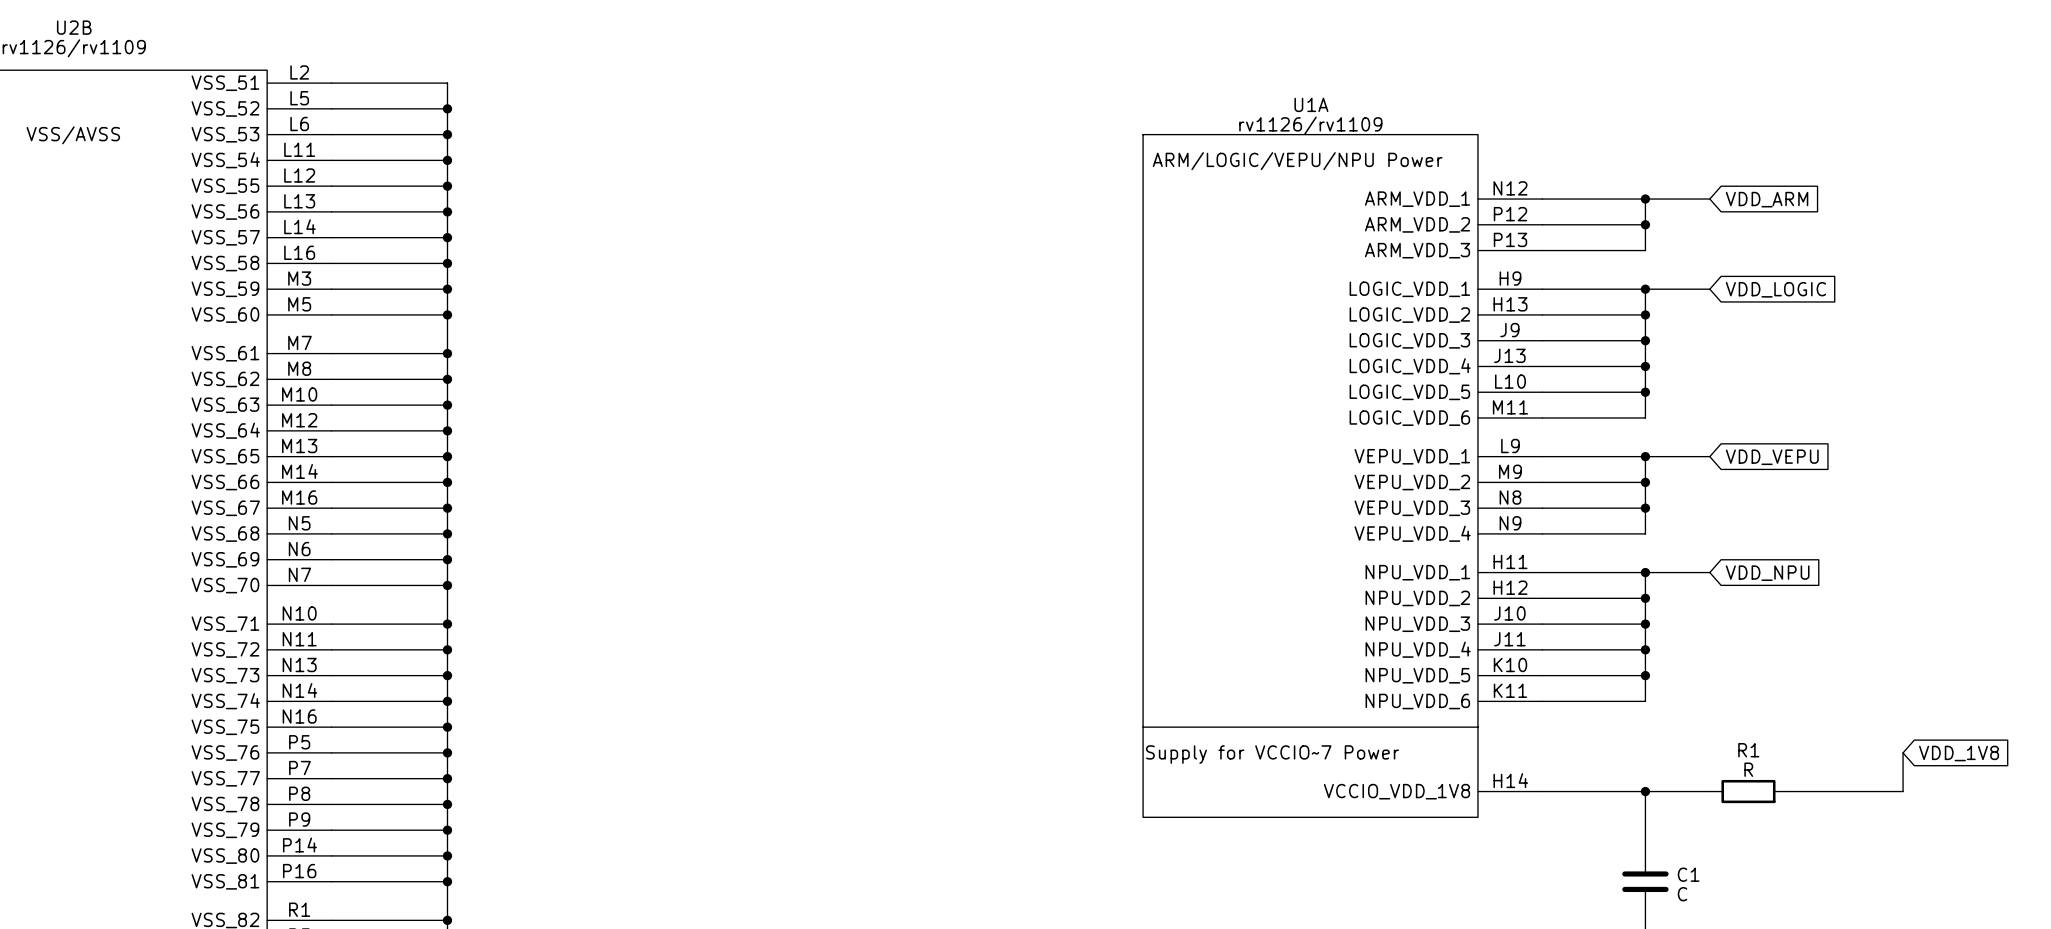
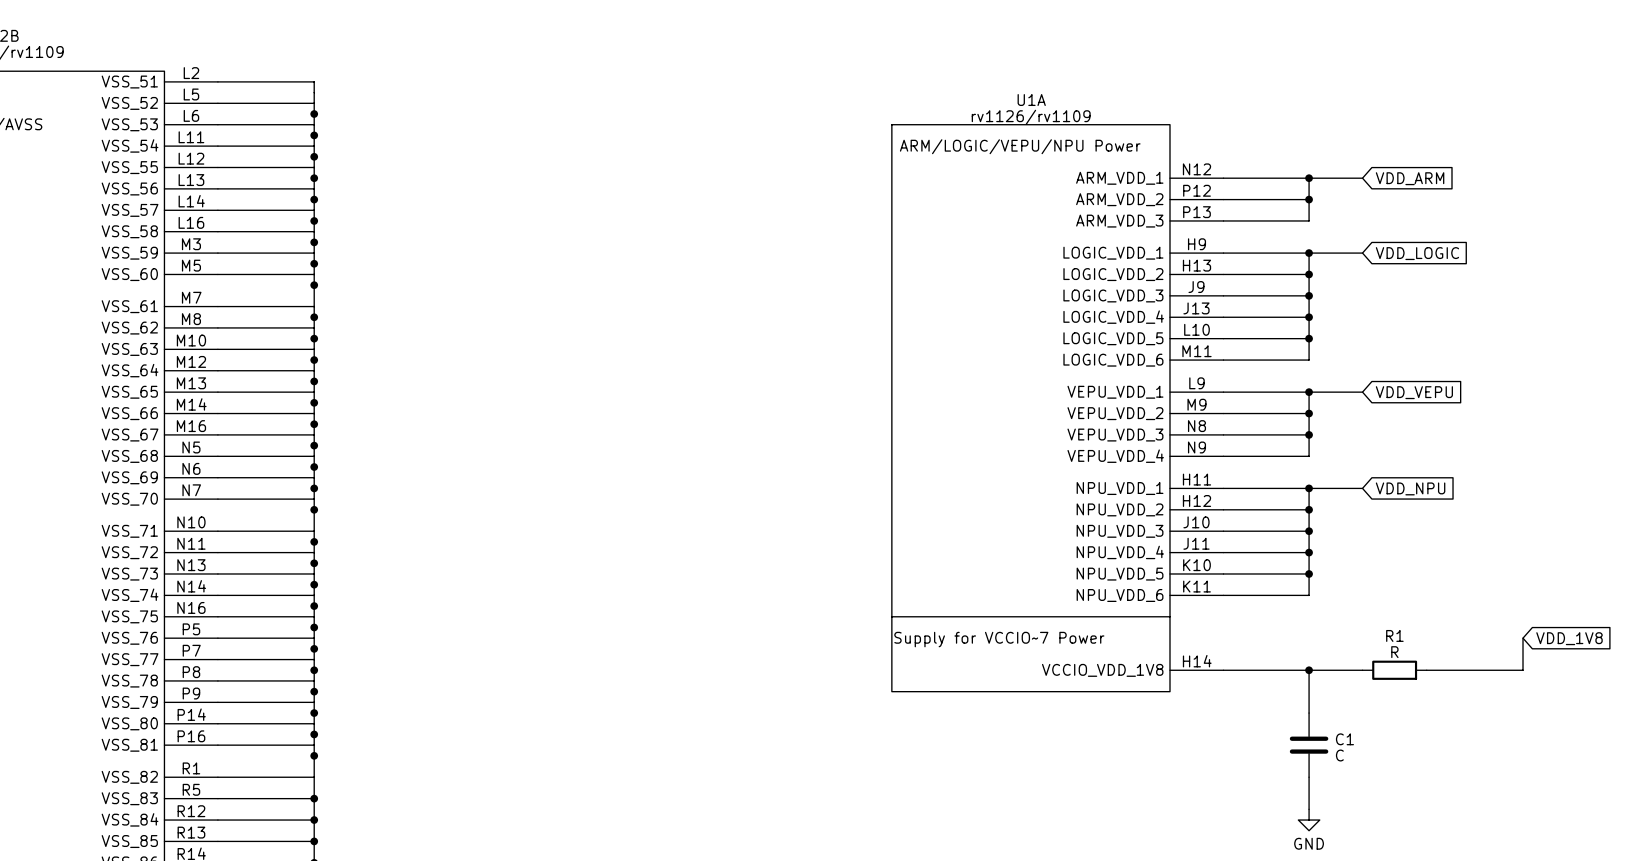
junction: (447, 108) -> none
junction: none -> (314, 114)
junction: (447, 134) -> none
junction: none -> (314, 135)
junction: (447, 160) -> none
junction: none -> (314, 156)
junction: (447, 186) -> none
junction: none -> (314, 178)
junction: (447, 211) -> none
junction: none -> (314, 199)
junction: (447, 237) -> none
junction: none -> (314, 220)
junction: (447, 263) -> none
junction: none -> (314, 242)
junction: (447, 289) -> none
junction: none -> (314, 263)
junction: (447, 314) -> none
junction: none -> (314, 285)
junction: (447, 353) -> none
junction: none -> (314, 317)
junction: (447, 379) -> none
junction: none -> (314, 338)
junction: (447, 405) -> none
junction: none -> (314, 360)
junction: (447, 430) -> none
junction: none -> (314, 381)
junction: (447, 456) -> none
junction: none -> (314, 402)
junction: (447, 482) -> none
junction: none -> (314, 424)
junction: (447, 508) -> none
junction: none -> (314, 445)
junction: (447, 533) -> none
junction: none -> (314, 467)
junction: (447, 559) -> none
junction: none -> (314, 488)
junction: (447, 585) -> none
junction: none -> (314, 509)
junction: (447, 624) -> none
junction: none -> (314, 541)
junction: (447, 649) -> none
junction: none -> (314, 563)
junction: (447, 675) -> none
junction: none -> (314, 584)
junction: (447, 701) -> none
junction: none -> (314, 606)
junction: (447, 727) -> none
junction: none -> (314, 627)
junction: (447, 752) -> none
junction: none -> (314, 648)
junction: (447, 778) -> none
junction: none -> (314, 670)
junction: (447, 804) -> none
junction: none -> (314, 691)
junction: (447, 830) -> none
junction: none -> (314, 713)
junction: (447, 855) -> none
junction: none -> (314, 734)
junction: (447, 881) -> none
junction: none -> (314, 755)
junction: (447, 920) -> none

